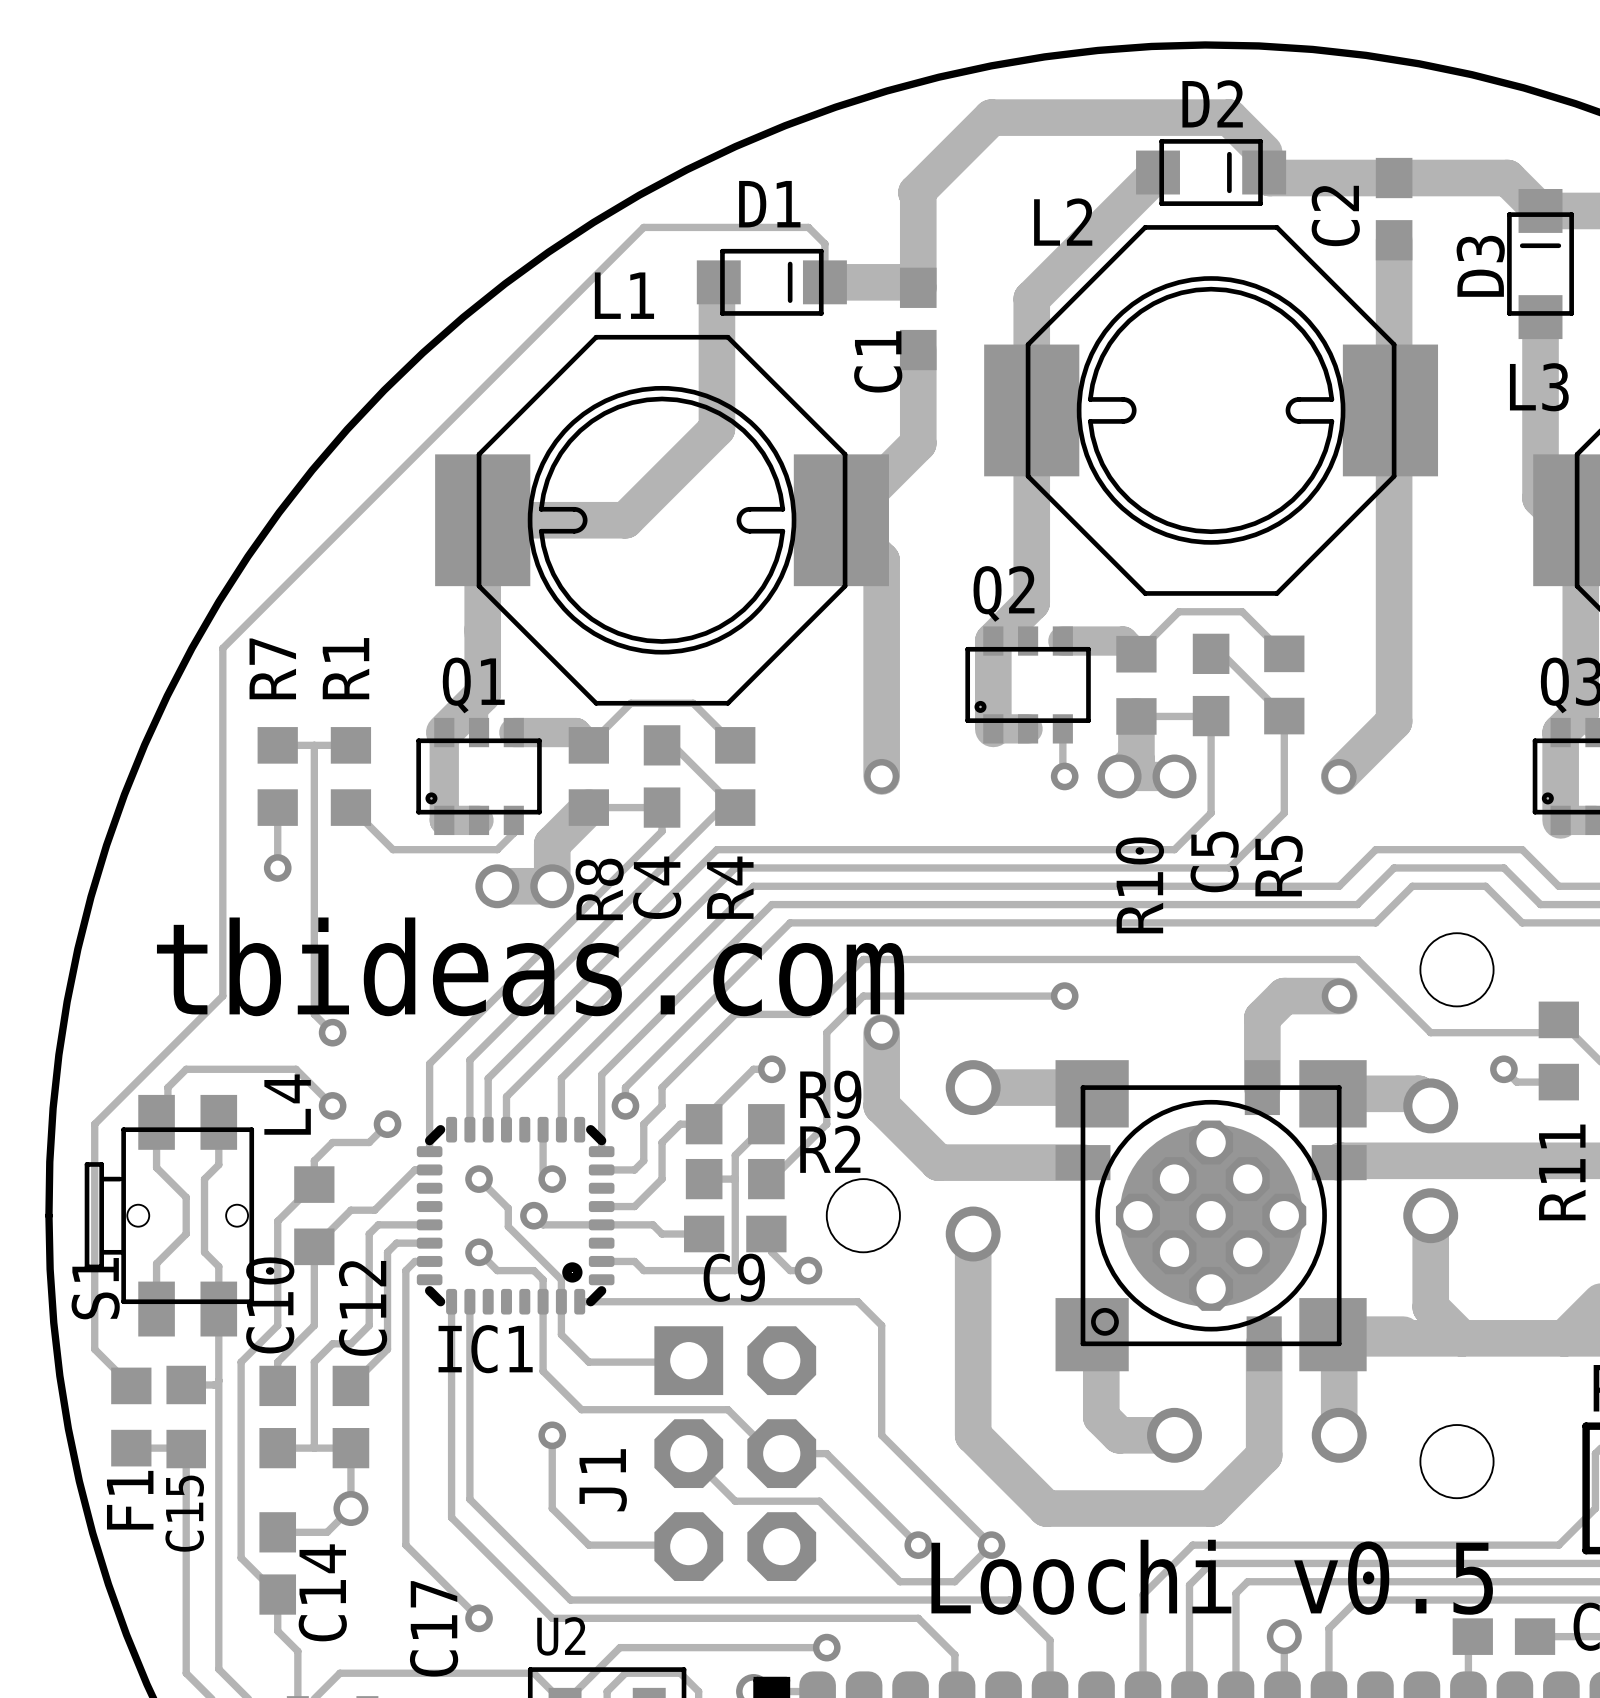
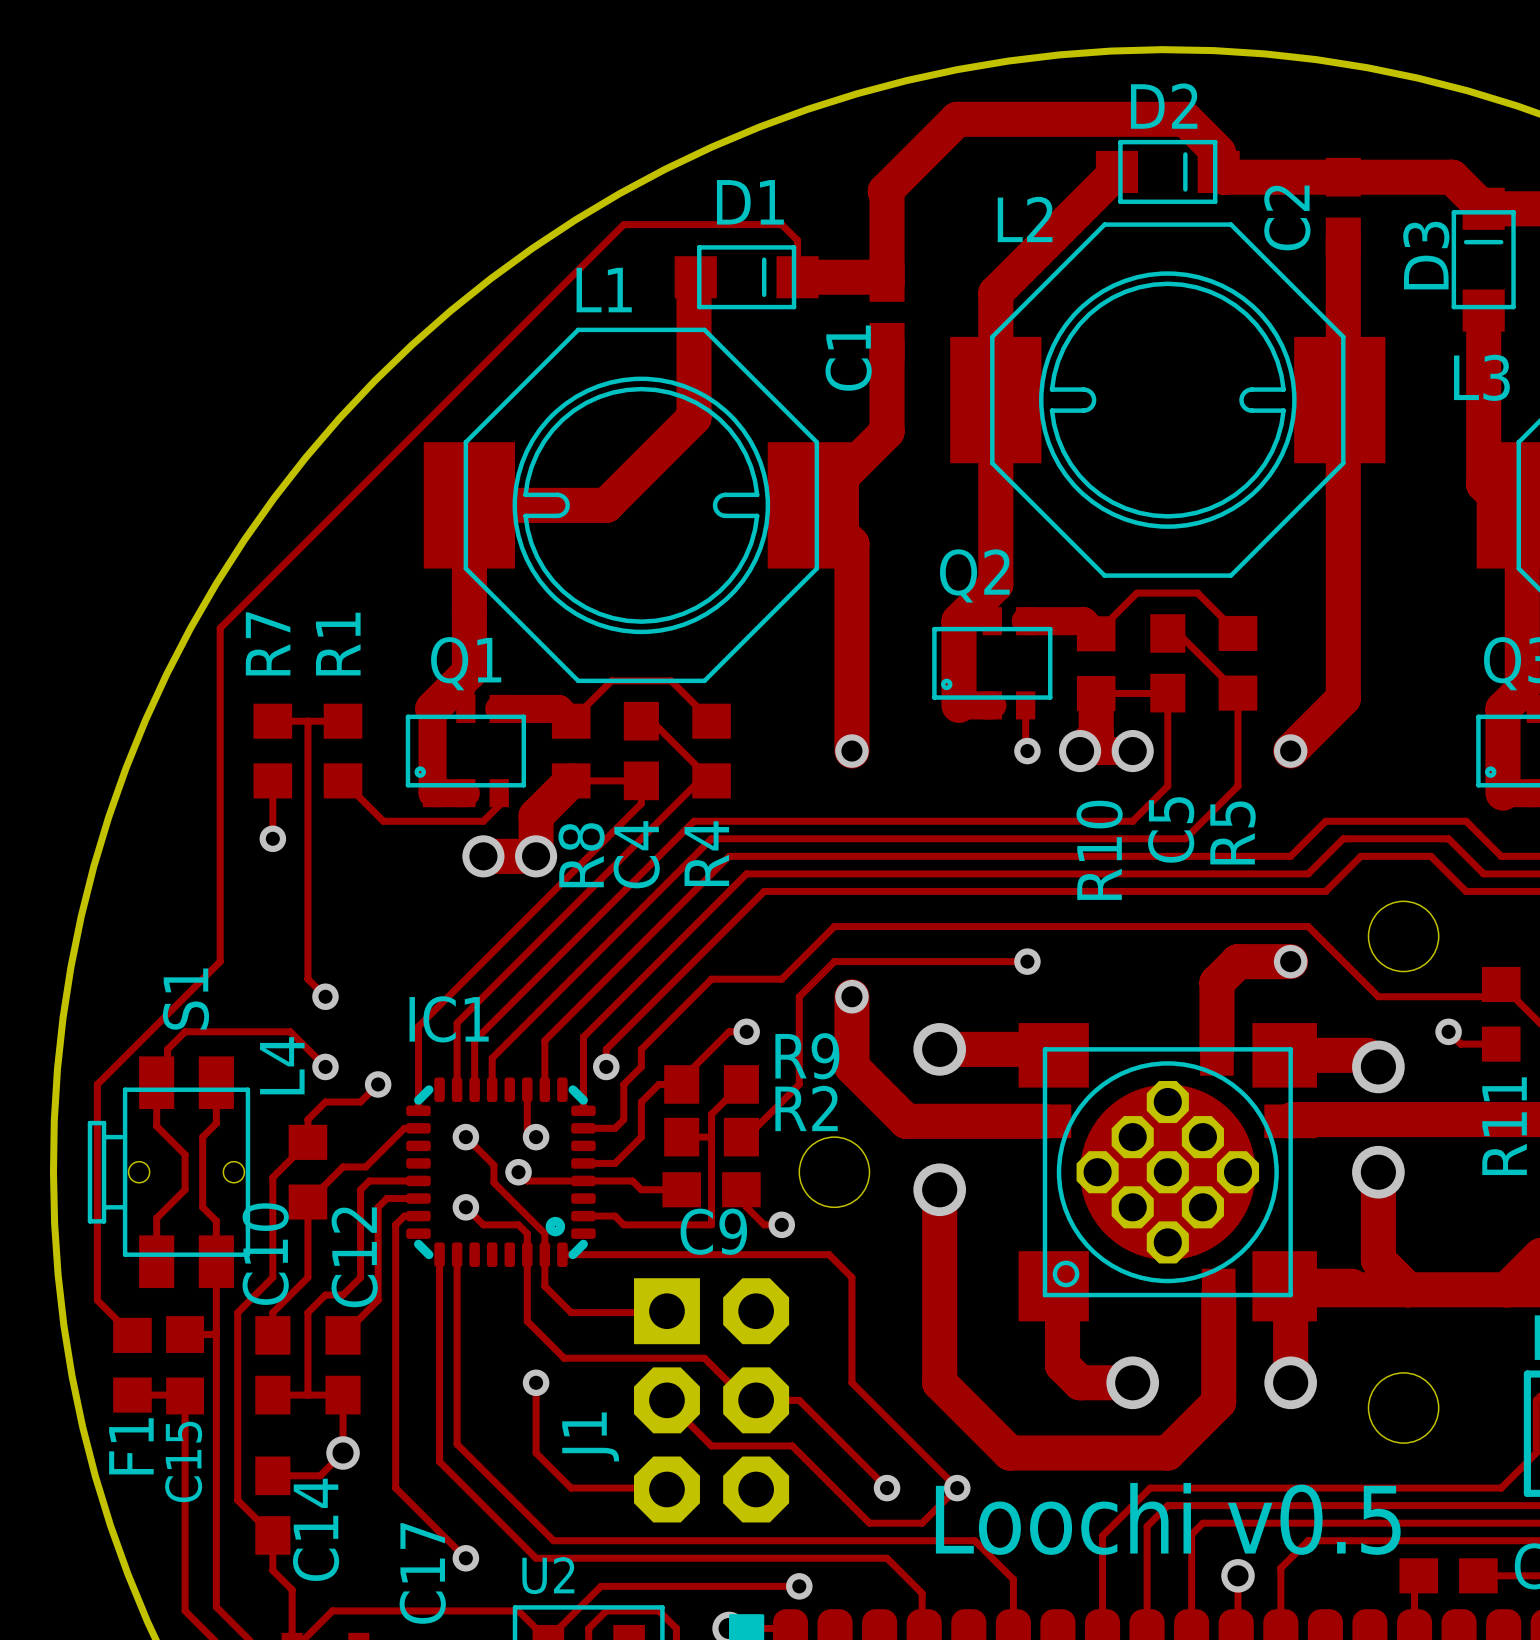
text: tbideas.com (530, 966) -> none
S1 name position: S1 (95, 1288) -> S1 (186, 999)
IC1 name position: IC1 (485, 1349) -> IC1 (449, 1019)

